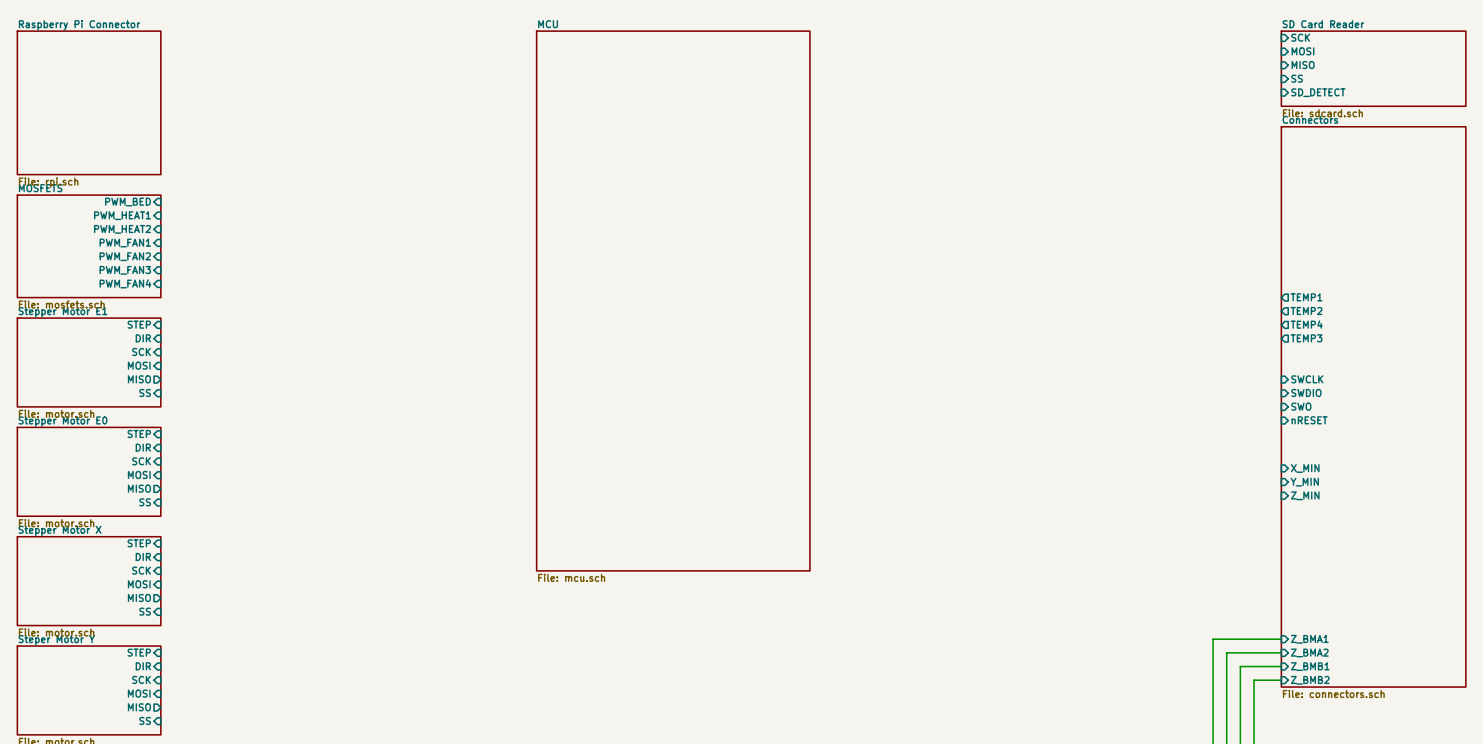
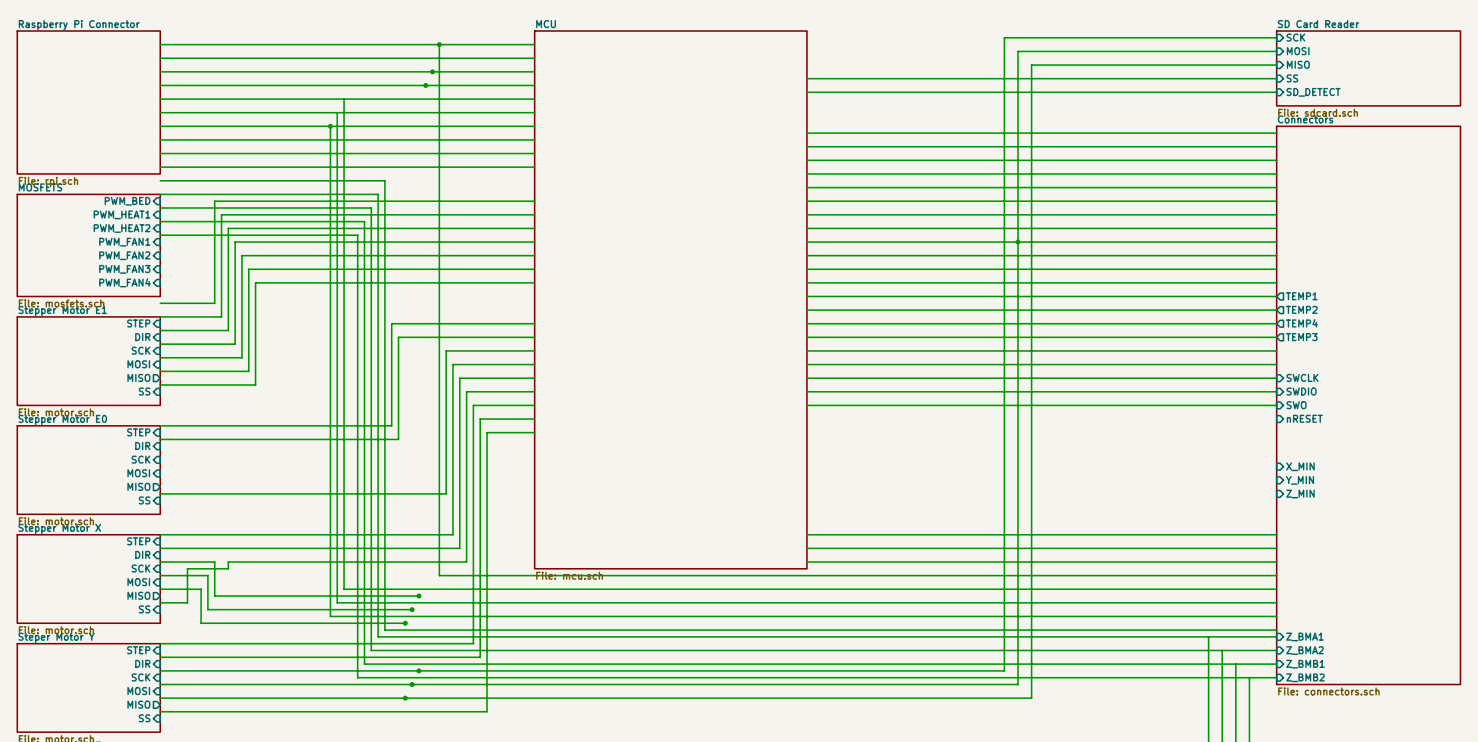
wire: none -> (1276, 37) (1004, 37) (1004, 670) (160, 670)
wire: none -> (160, 44) (534, 44)
wire: none -> (439, 44) (439, 575) (1276, 575)
junction: none -> (439, 44)
wire: none -> (1276, 51) (1017, 51) (1017, 684) (160, 684)
wire: none -> (160, 58) (534, 58)
wire: none -> (1276, 65) (1031, 65) (1031, 698) (160, 698)
wire: none -> (160, 71) (534, 71)
junction: none -> (432, 71)
wire: none -> (806, 78) (1276, 78)
wire: none -> (160, 85) (534, 85)
junction: none -> (425, 85)
wire: none -> (806, 92) (1276, 92)
wire: none -> (160, 99) (534, 99)
wire: none -> (344, 99) (344, 589) (1276, 589)
wire: none -> (160, 112) (534, 112)
wire: none -> (337, 112) (337, 602) (1276, 602)
wire: none -> (160, 126) (534, 126)
wire: none -> (330, 126) (330, 616) (1276, 616)
junction: none -> (330, 126)
wire: none -> (806, 133) (1276, 133)
wire: none -> (160, 139) (534, 139)
wire: none -> (806, 146) (1276, 146)
wire: none -> (160, 153) (534, 153)
wire: none -> (806, 160) (1276, 160)
wire: none -> (160, 167) (534, 167)
wire: none -> (806, 173) (1276, 173)
wire: none -> (160, 180) (384, 180) (384, 630) (1276, 630)
wire: none -> (806, 187) (1276, 187)
wire: none -> (160, 194) (378, 194) (378, 636) (1208, 636)
wire: none -> (534, 201) (214, 201) (214, 303) (160, 303)
wire: none -> (806, 201) (1276, 201)
wire: none -> (160, 208) (371, 208) (371, 650) (1222, 650)
wire: none -> (534, 214) (221, 214) (221, 316) (160, 316)
wire: none -> (806, 214) (1276, 214)
wire: none -> (160, 221) (364, 221) (364, 664) (1235, 664)
wire: none -> (534, 228) (228, 228) (228, 330) (160, 330)
wire: none -> (806, 228) (1276, 228)
wire: none -> (160, 235) (357, 235) (357, 677) (1249, 677)
wire: none -> (534, 242) (235, 242) (235, 344) (160, 344)
wire: none -> (806, 242) (1276, 242)
junction: none -> (1017, 242)
wire: none -> (534, 255) (241, 255) (241, 357) (160, 357)
wire: none -> (806, 255) (1276, 255)
wire: none -> (534, 269) (248, 269) (248, 371) (160, 371)
wire: none -> (806, 269) (1276, 269)
wire: none -> (534, 282) (255, 282) (255, 384) (160, 384)
wire: none -> (806, 282) (1276, 282)
wire: none -> (806, 296) (1276, 296)
wire: none -> (806, 310) (1276, 310)
wire: none -> (534, 323) (391, 323) (391, 425) (160, 425)
wire: none -> (806, 323) (1276, 323)
wire: none -> (534, 337) (398, 337) (398, 439) (160, 439)
wire: none -> (806, 337) (1276, 337)
wire: none -> (534, 350) (446, 350) (446, 493) (160, 493)
wire: none -> (806, 350) (1276, 350)
wire: none -> (534, 364) (452, 364) (452, 534) (160, 534)
wire: none -> (806, 364) (1276, 364)
wire: none -> (534, 378) (459, 378) (459, 548) (160, 548)
wire: none -> (806, 378) (1276, 378)
wire: none -> (534, 391) (466, 391) (466, 561) (228, 561) (228, 568) (187, 568) (187, 602) (160, 602)
wire: none -> (806, 391) (1276, 391)
wire: none -> (534, 405) (473, 405) (473, 643) (160, 643)
wire: none -> (806, 405) (1276, 405)
wire: none -> (534, 419) (480, 419) (480, 657) (160, 657)
wire: none -> (534, 432) (487, 432) (487, 711) (160, 711)
wire: none -> (806, 534) (1276, 534)
wire: none -> (806, 548) (1276, 548)
wire: none -> (160, 561) (214, 561) (214, 596) (418, 596)
wire: none -> (806, 561) (1276, 561)
wire: none -> (160, 575) (207, 575) (207, 609) (412, 609)
wire: none -> (160, 589) (201, 589) (201, 623) (405, 623)
junction: none -> (418, 596)
junction: none -> (412, 609)
junction: none -> (405, 623)
junction: none -> (418, 670)
junction: none -> (412, 684)
junction: none -> (405, 698)

